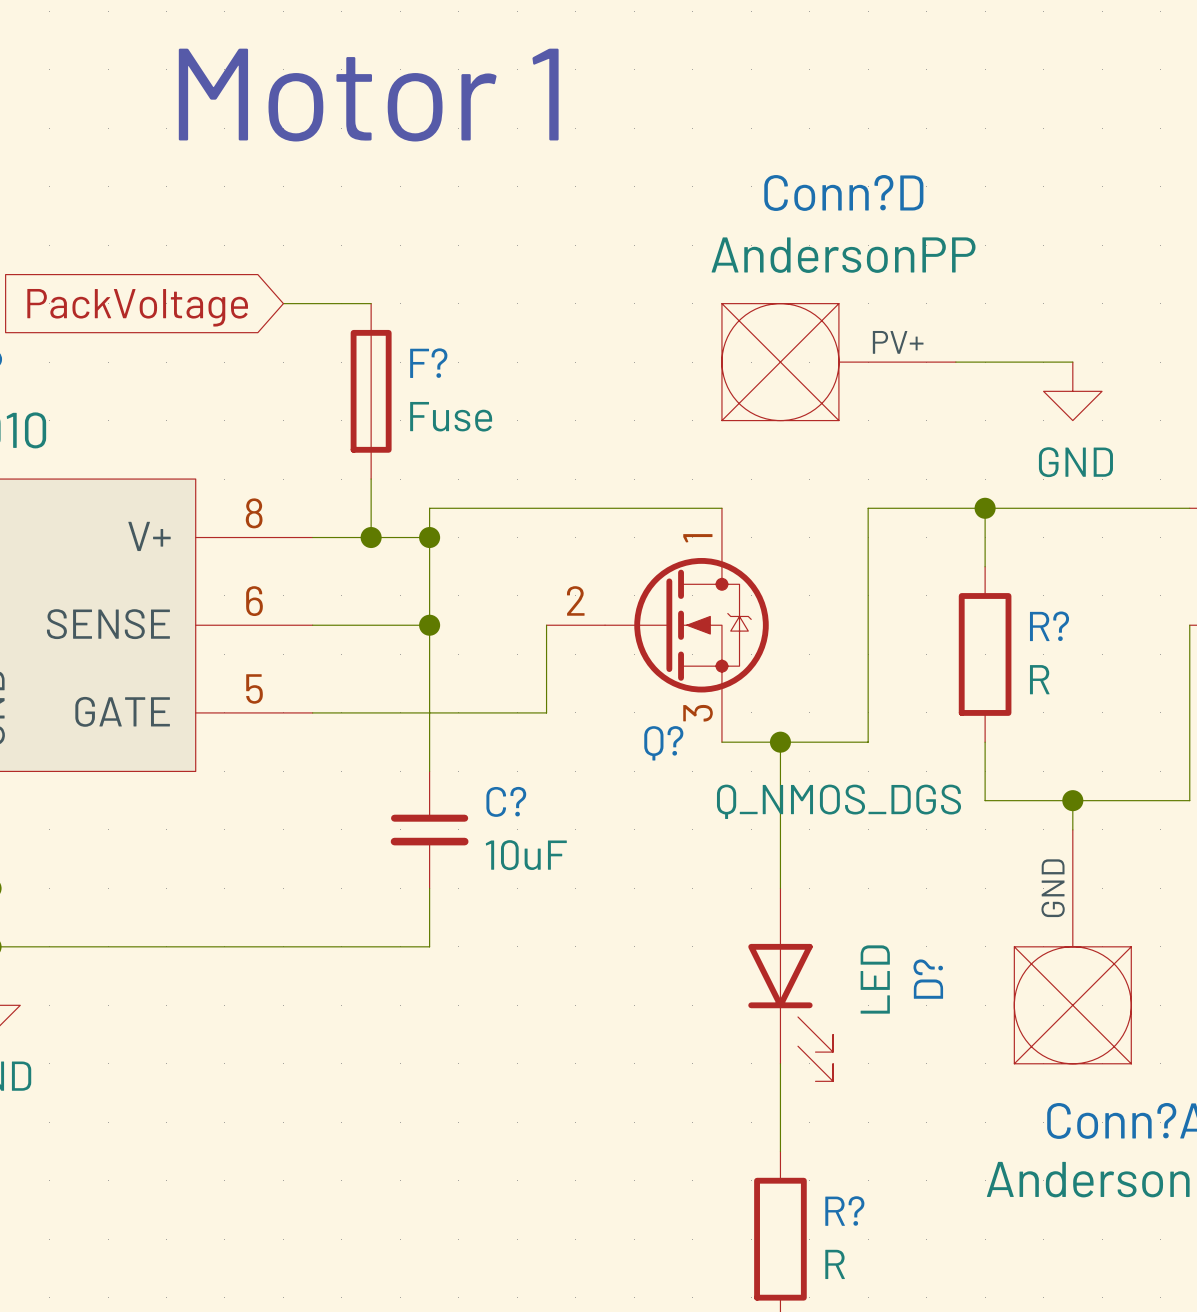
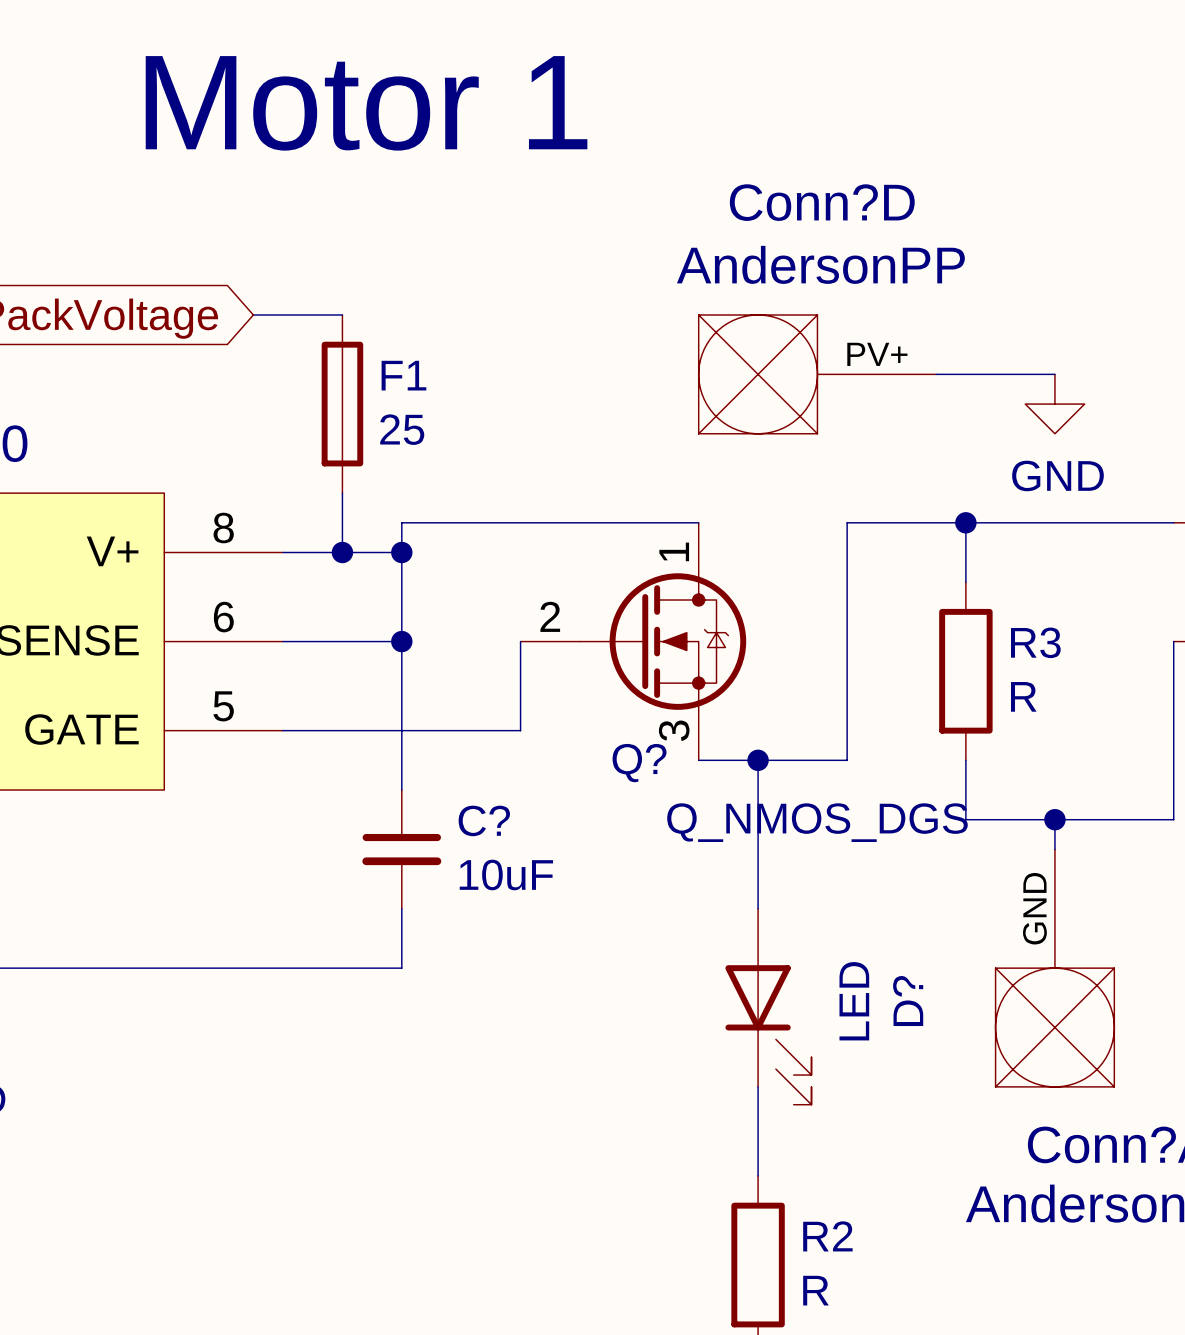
F? name: F? (428, 363) -> F1 (403, 375)
F? value: Fuse (451, 416) -> 25 (402, 429)
R? name: R? (1049, 626) -> R3 (1035, 642)
R? name: R? (844, 1211) -> R2 (827, 1236)

